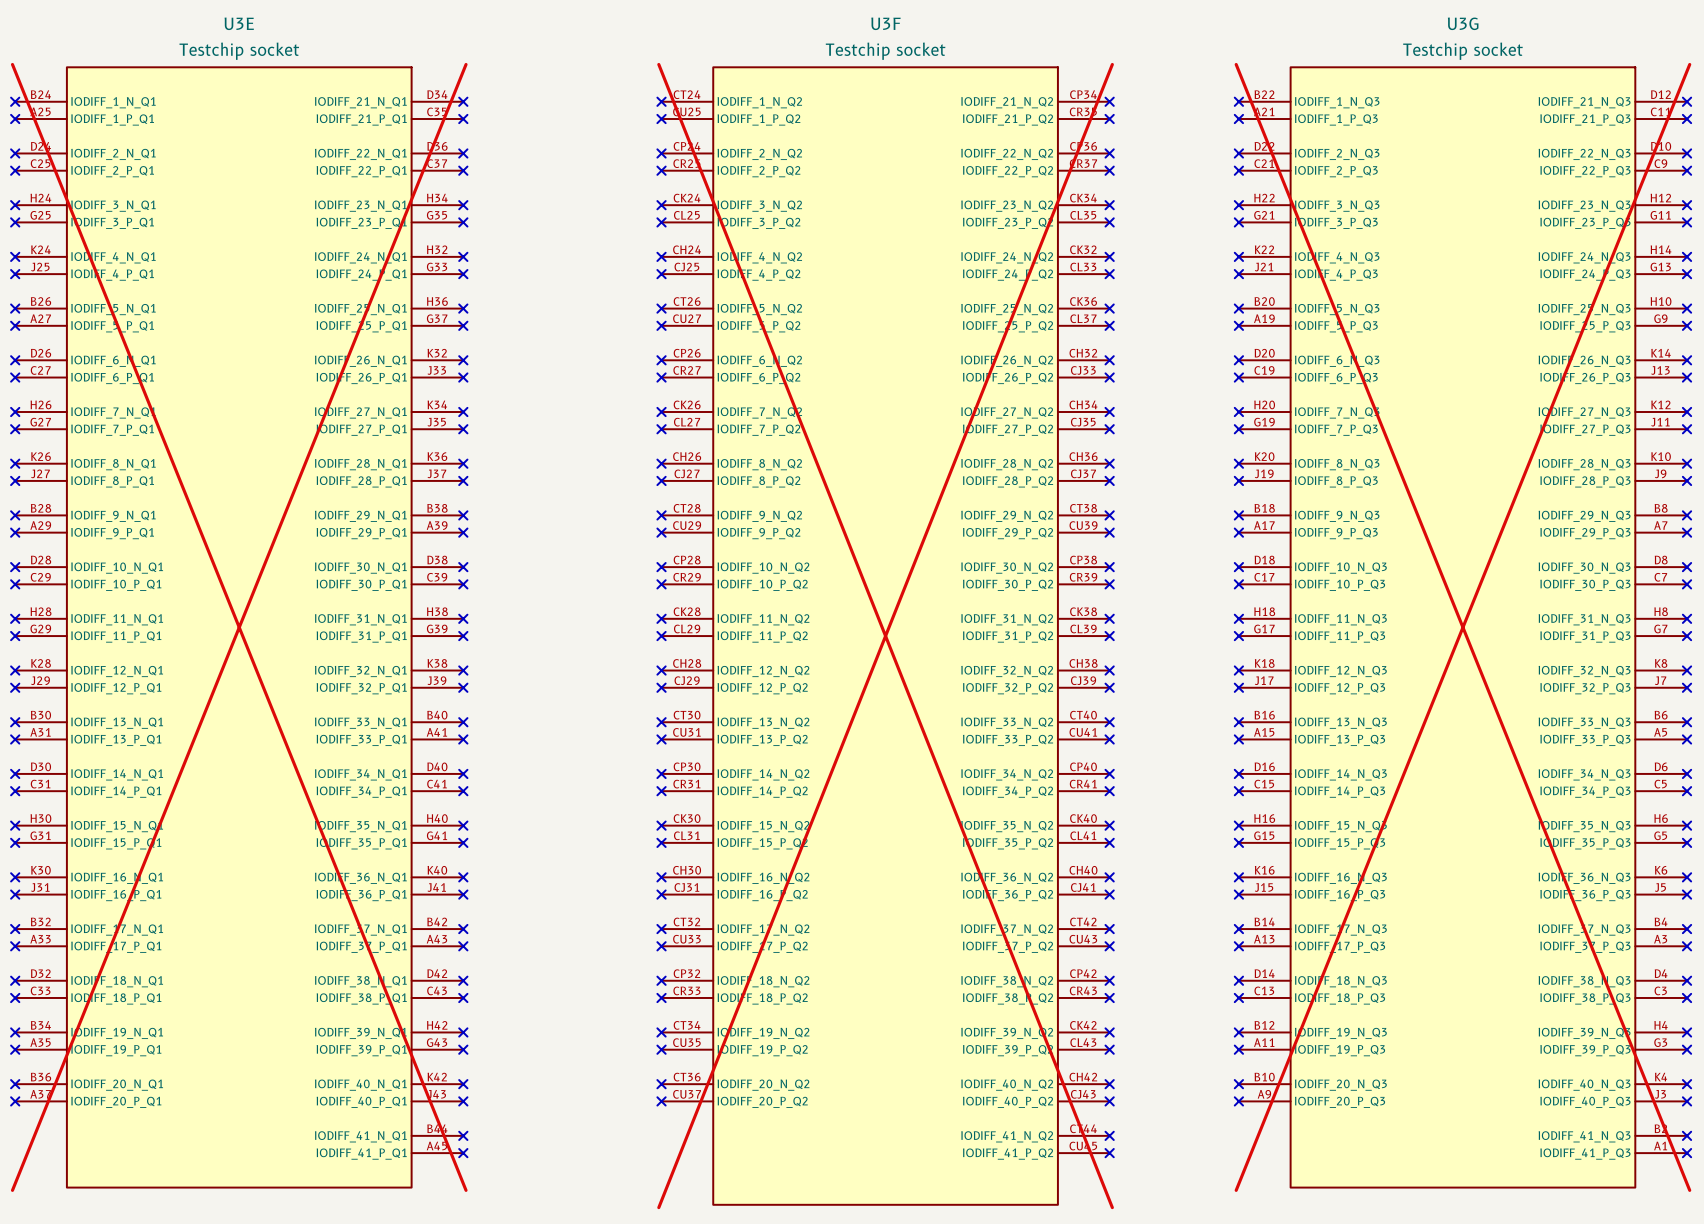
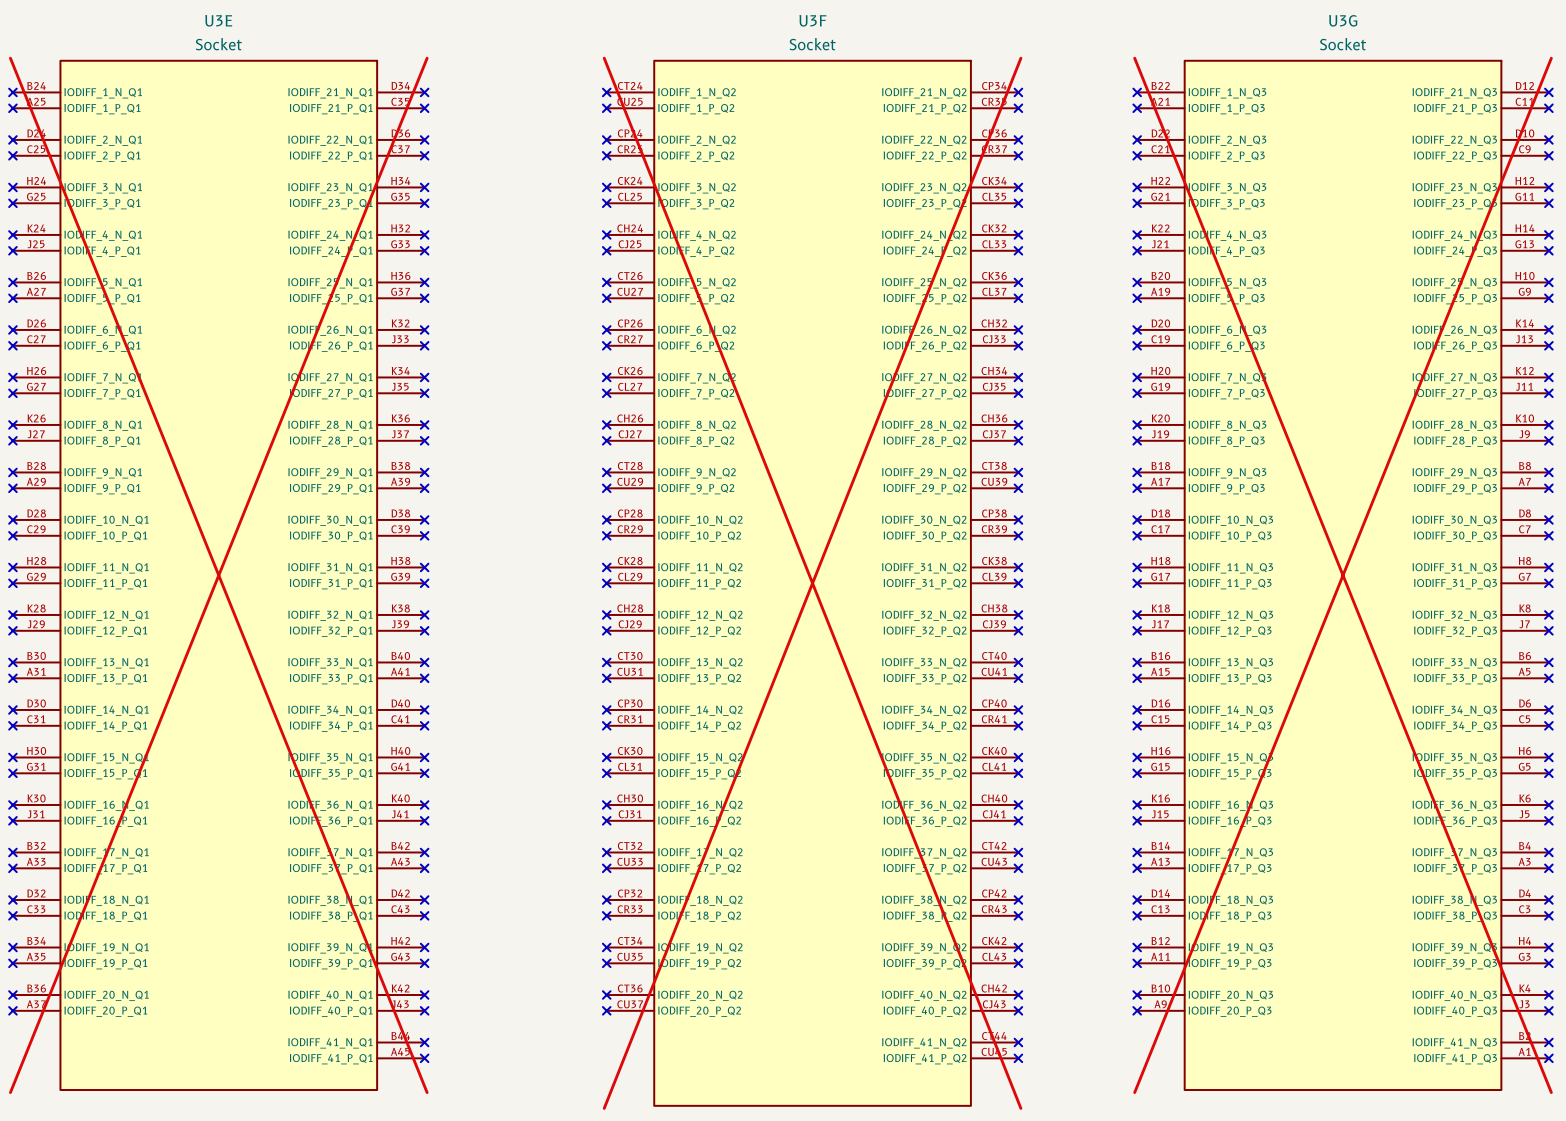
U3E value: Testchip socket (239, 51) -> Socket (218, 44)
U3F value: Testchip socket (885, 51) -> Socket (812, 44)
U3G value: Testchip socket (1462, 51) -> Socket (1343, 44)

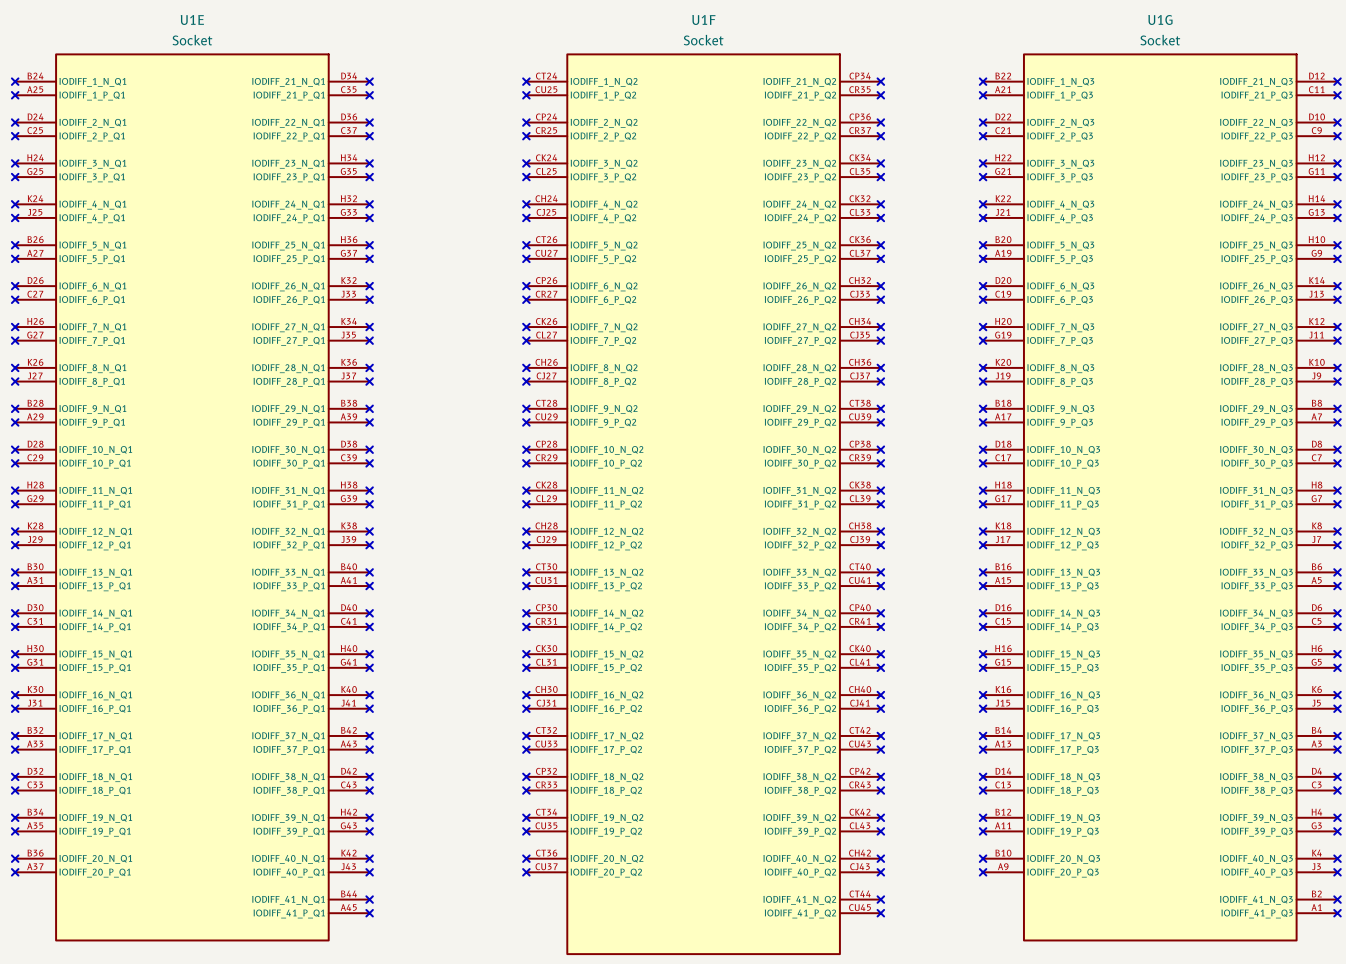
U3E name: U3E (218, 20) -> U1E (192, 19)
U3F name: U3F (812, 20) -> U1F (703, 19)
U3G name: U3G (1343, 20) -> U1G (1160, 19)
U3E do-not-place cross: (218, 575) -> none
U3G do-not-place cross: (1343, 575) -> none
U3F do-not-place cross: (812, 583) -> none

